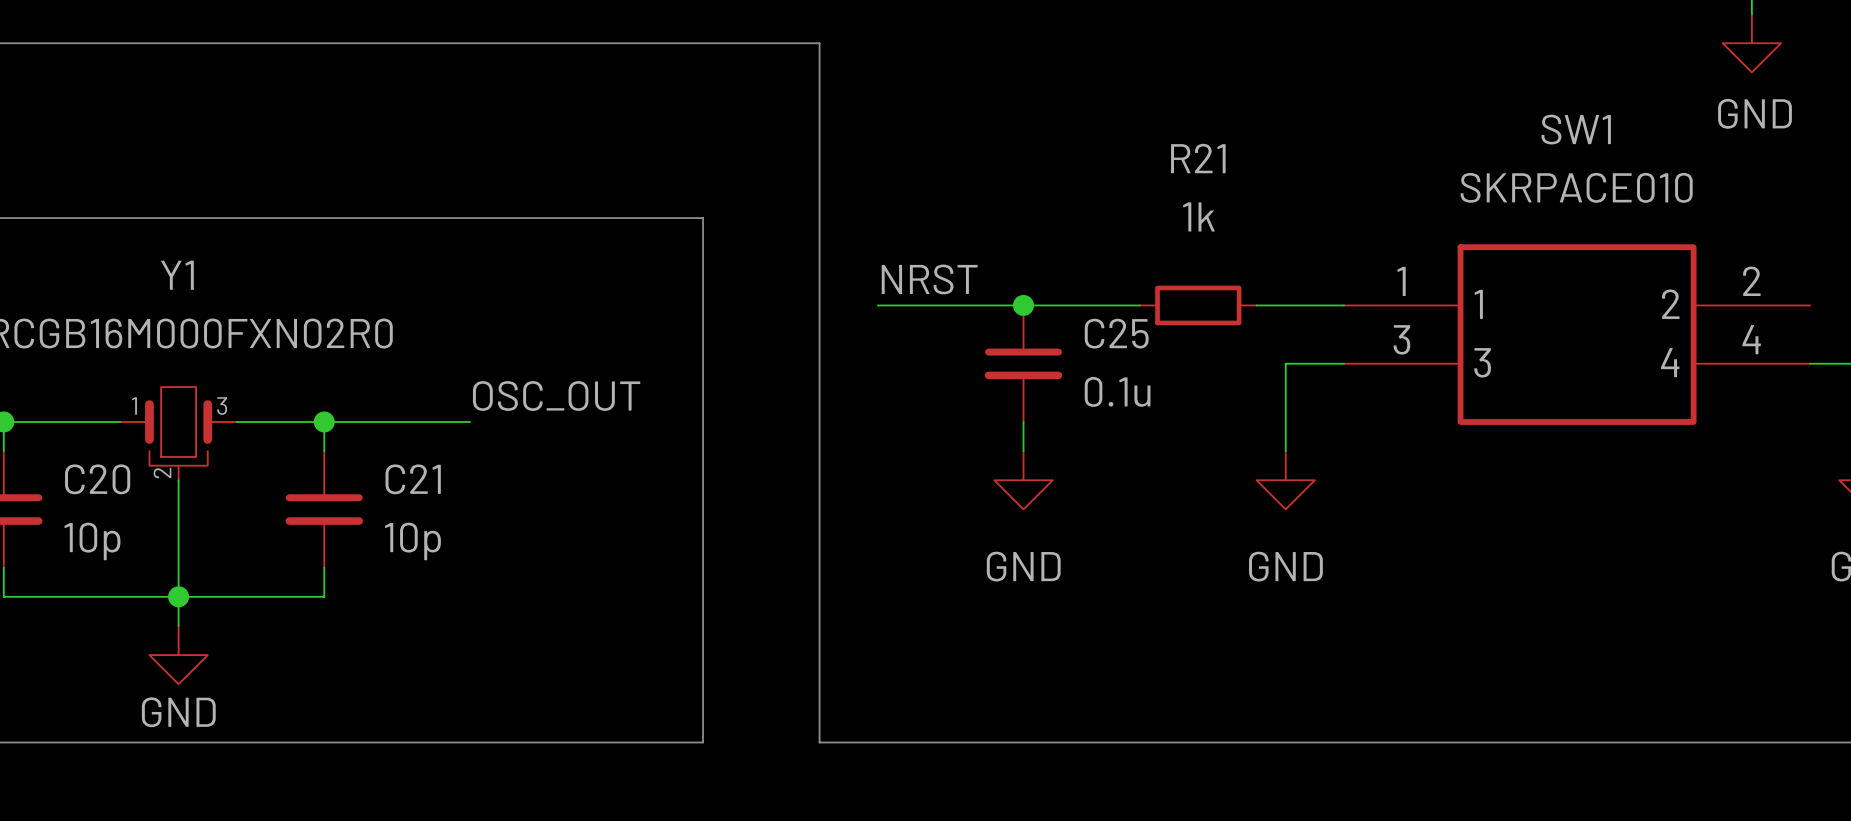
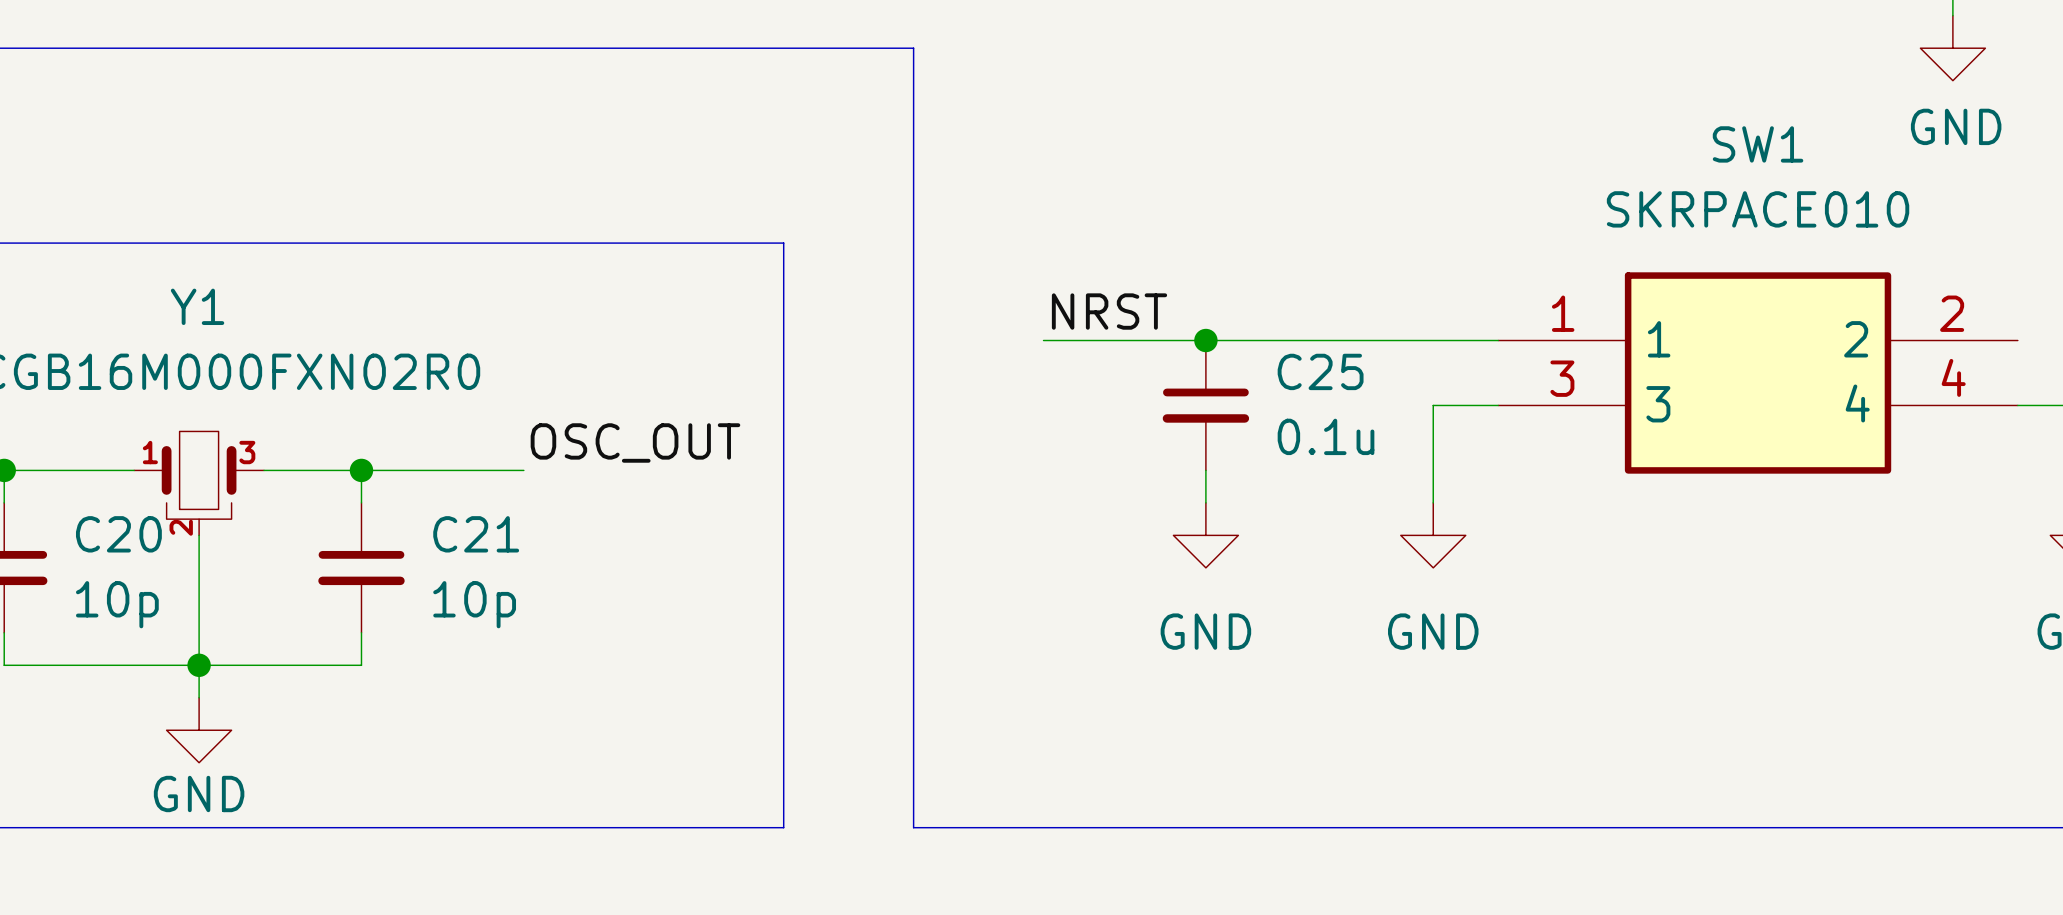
label position: NRST (929, 279) -> NRST (1109, 311)
wire: (877, 305) (936, 305) -> none
junction position: (1023, 305) -> (1205, 340)
wire: none -> (1270, 340) (1400, 340)
R21: 1k (1198, 305) -> none
C25 position: (1023, 363) -> (1205, 405)
wire: (1023, 422) (1023, 451) -> (1205, 470) (1205, 502)
power symbol position: GND (1023, 480) -> GND (1205, 535)

